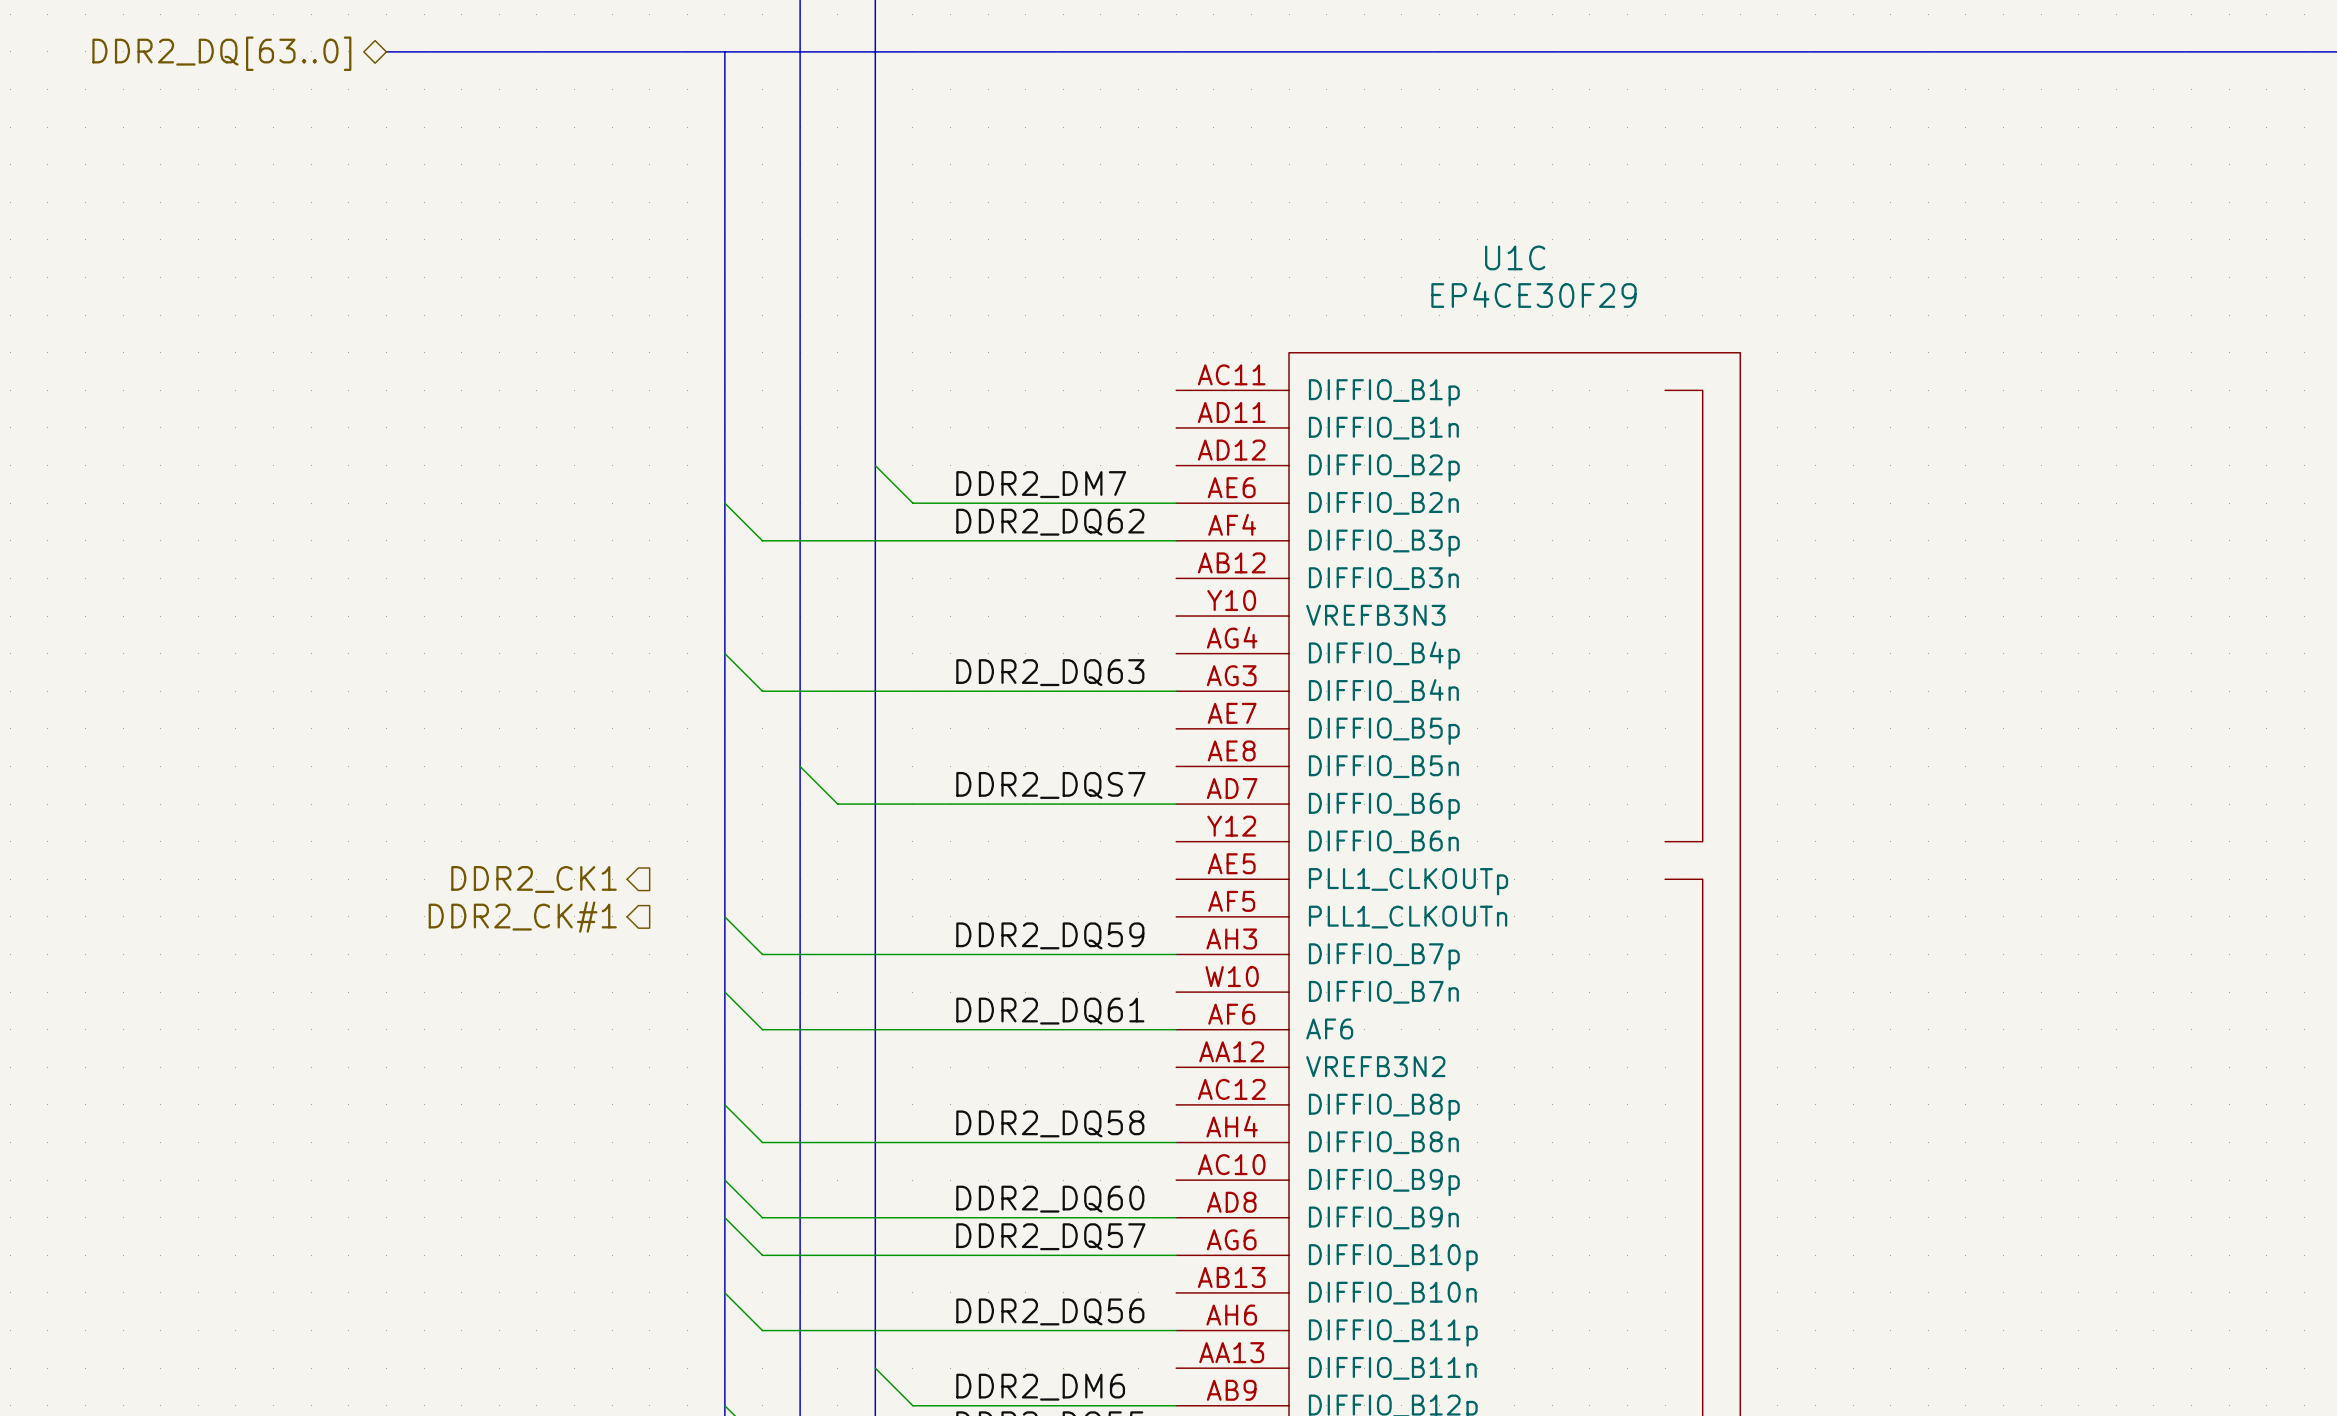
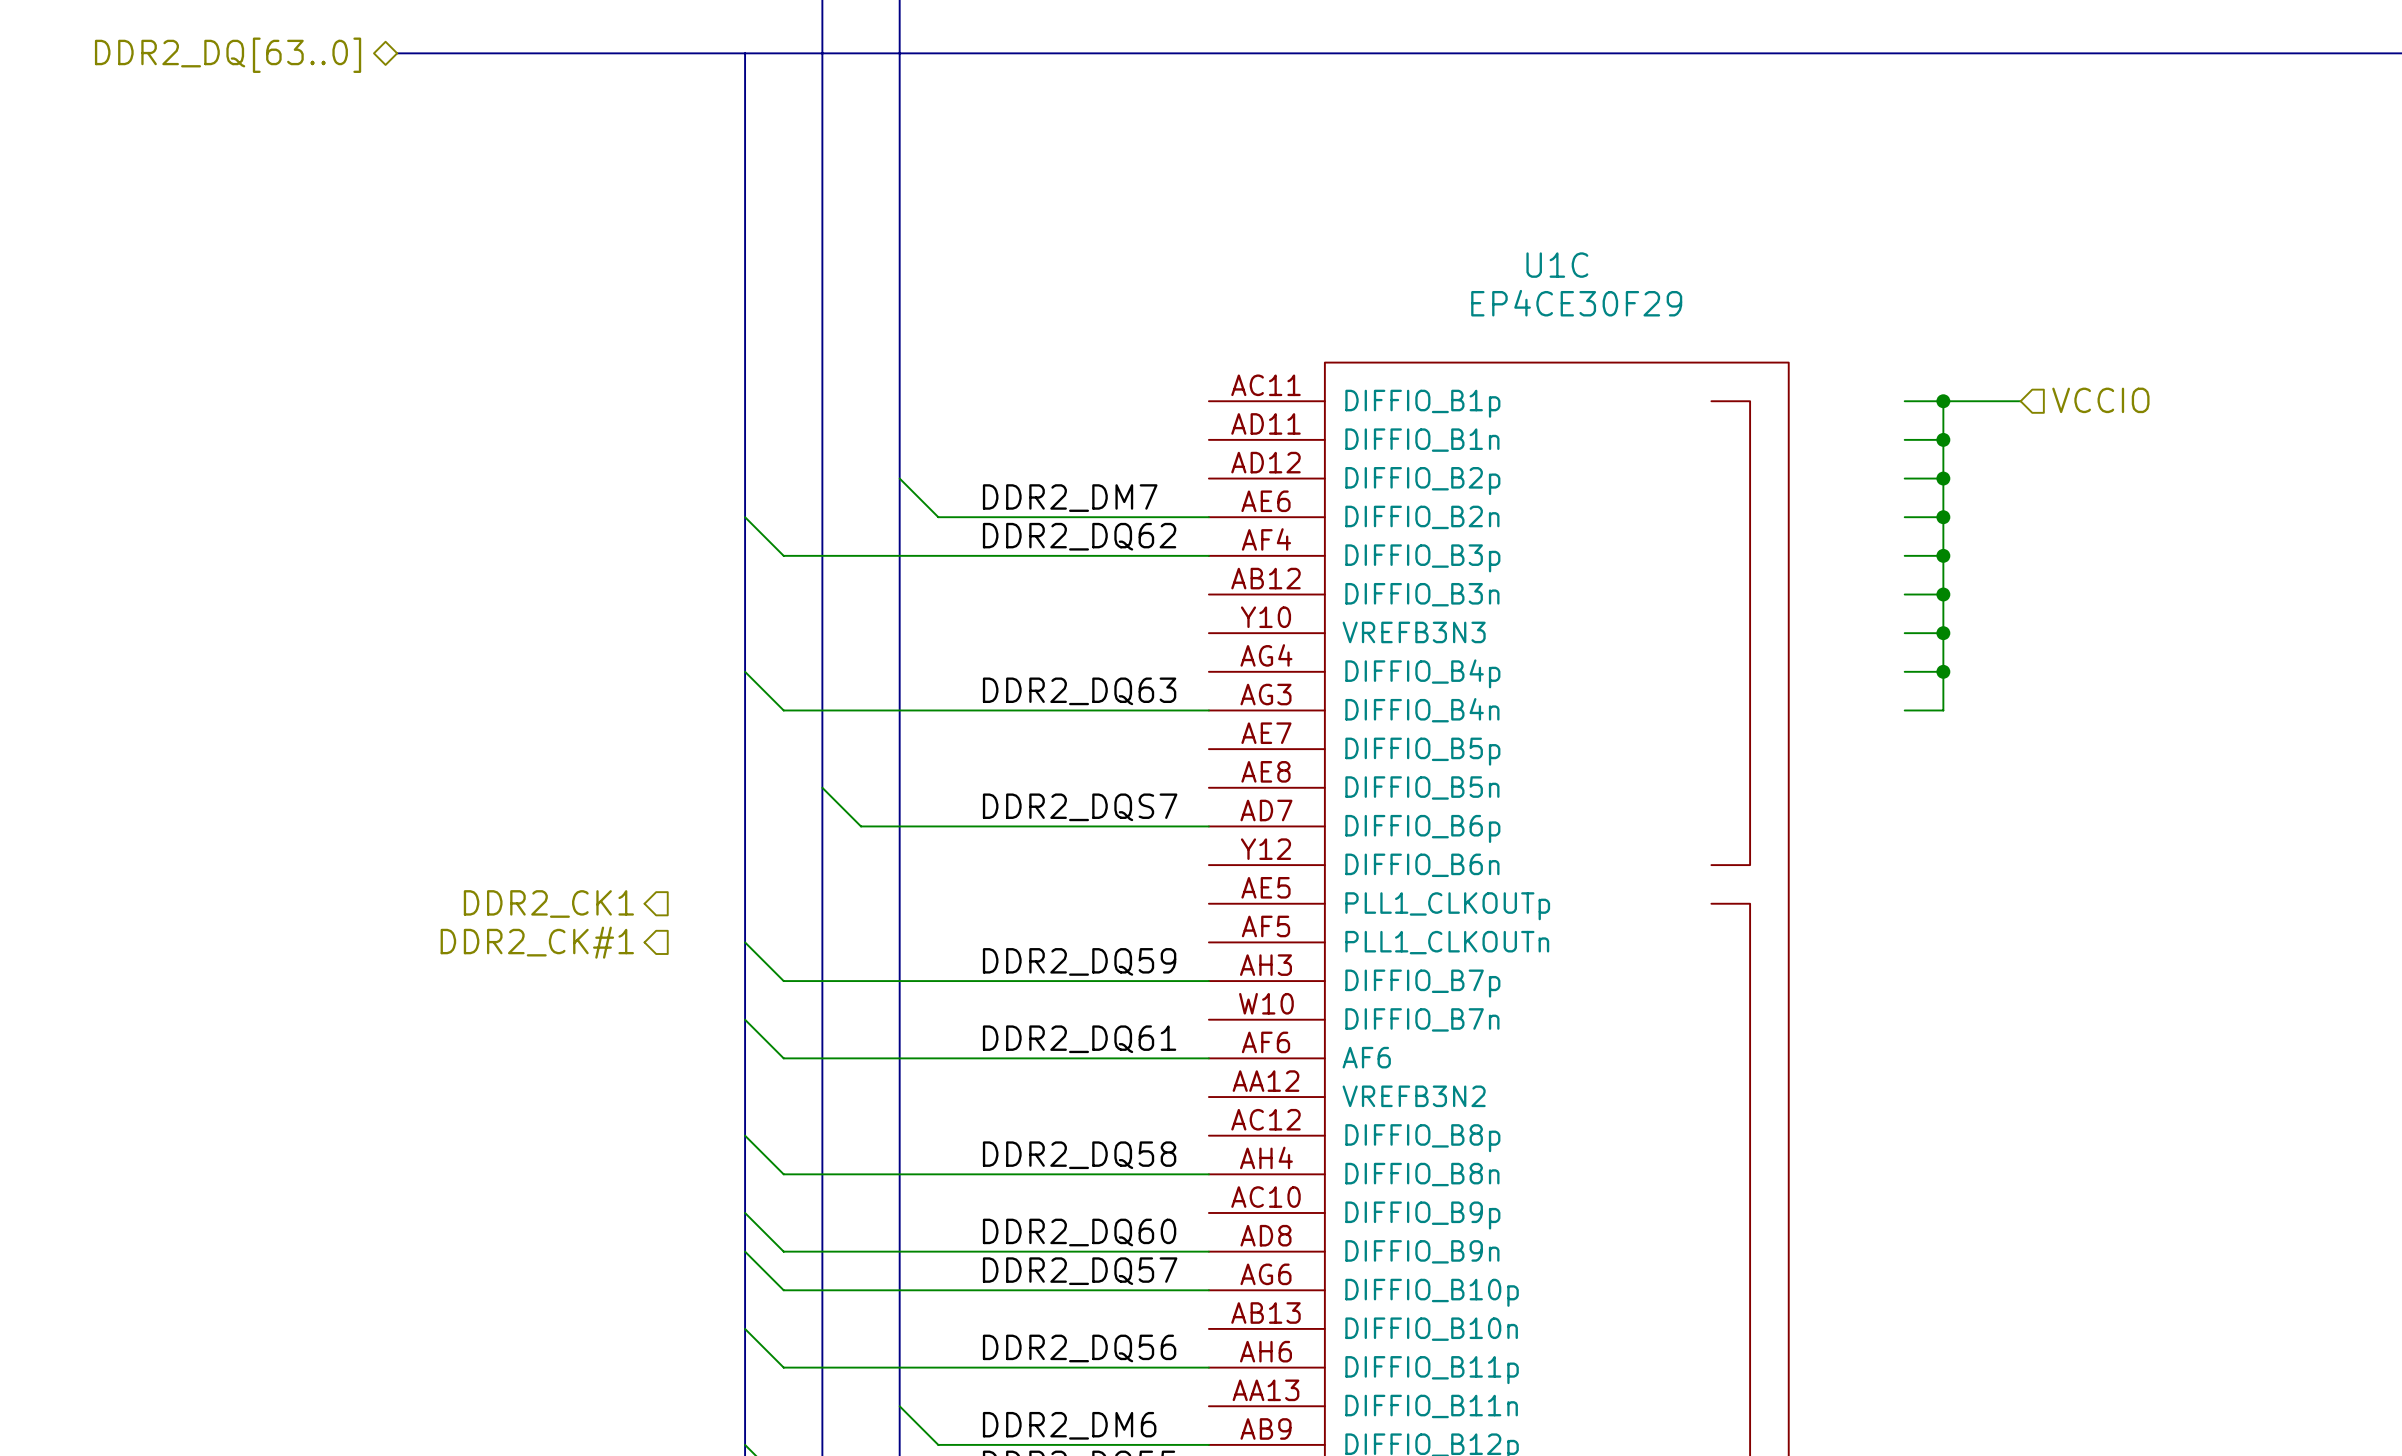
hierarchical label: none -> VCCIO (2100, 400)
wire: none -> (1904, 401) (2020, 401)
wire: none -> (1943, 401) (1943, 710) (1904, 710)
junction: none -> (1943, 401)
wire: none -> (1904, 439) (1943, 439)
junction: none -> (1943, 439)
wire: none -> (1904, 478) (1943, 478)
junction: none -> (1943, 478)
wire: none -> (1904, 517) (1943, 517)
junction: none -> (1943, 517)
wire: none -> (1904, 555) (1943, 555)
junction: none -> (1943, 555)
wire: none -> (1904, 594) (1943, 594)
junction: none -> (1943, 594)
wire: none -> (1904, 633) (1943, 633)
junction: none -> (1943, 633)
wire: none -> (1904, 671) (1943, 671)
junction: none -> (1943, 671)

